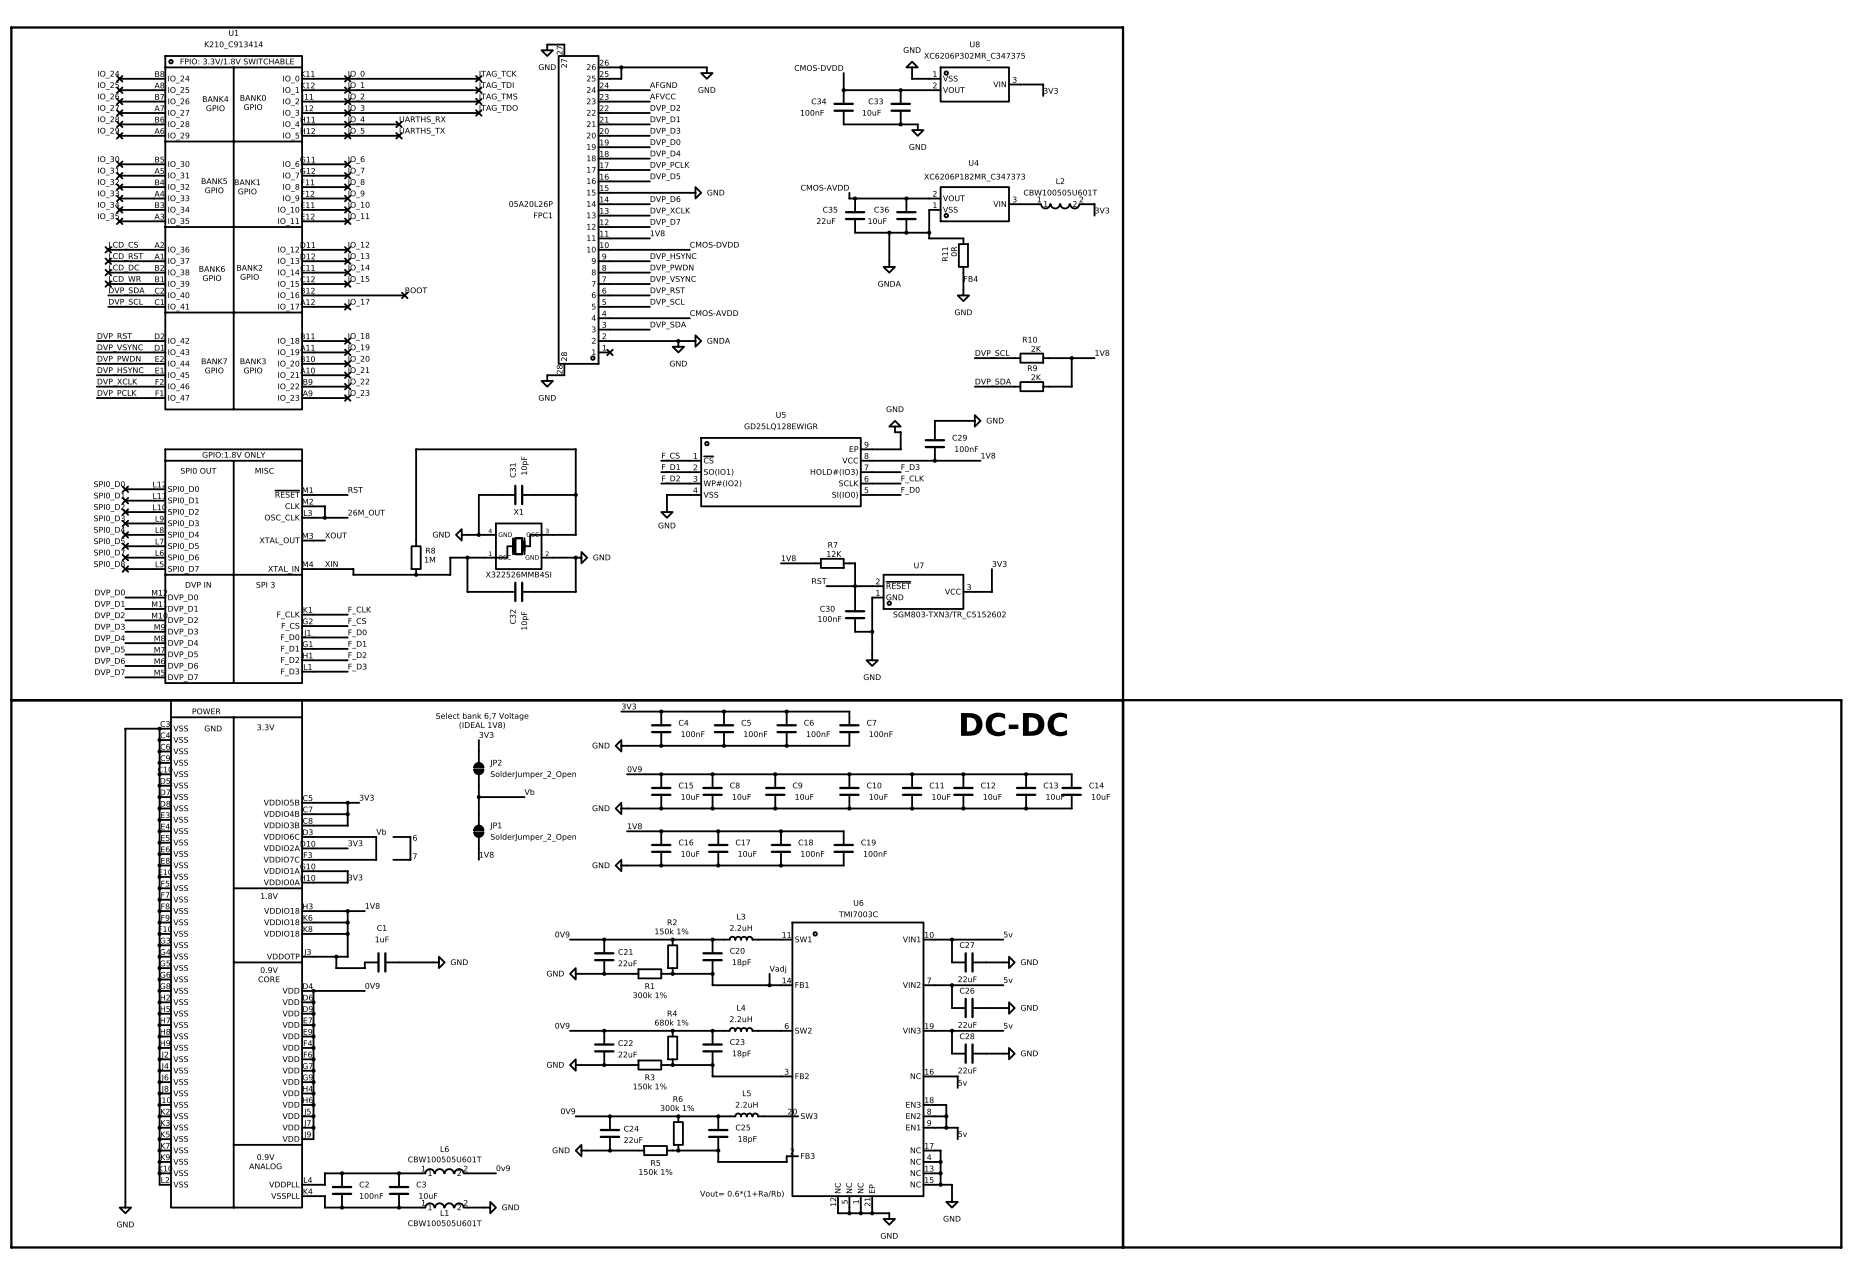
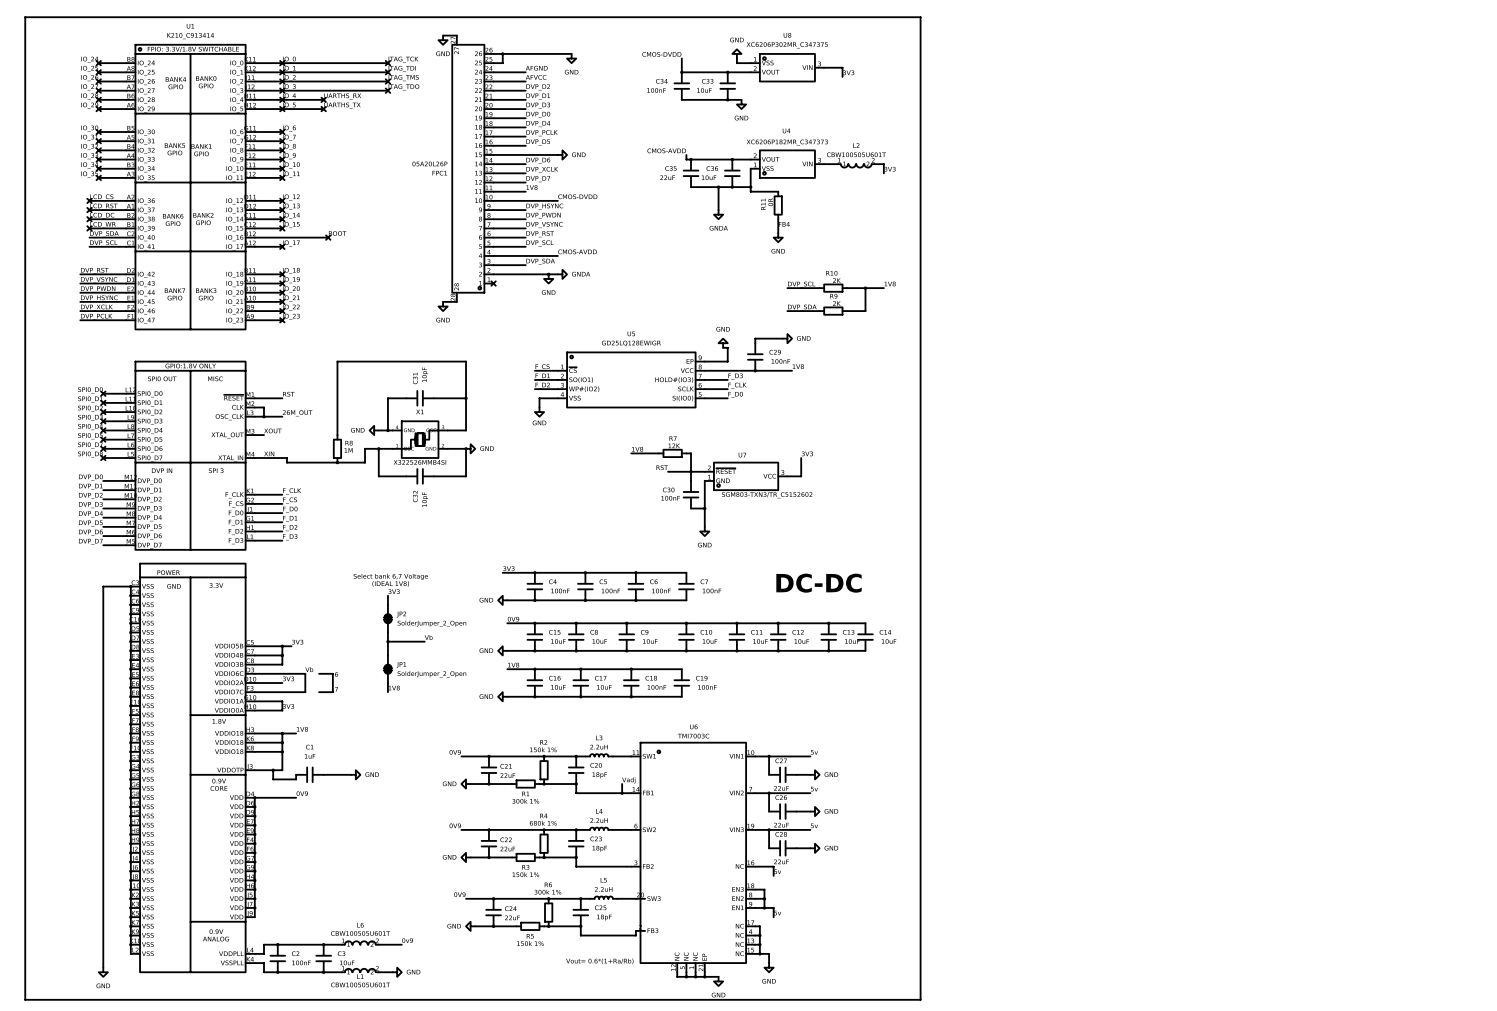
line: none -> (25, 17) (920, 17) (920, 999) (25, 999) (25, 17)
line: (11, 700) (1841, 700) (1841, 1247) (11, 1247) (11, 27) (1123, 27) (1123, 1247) -> none

